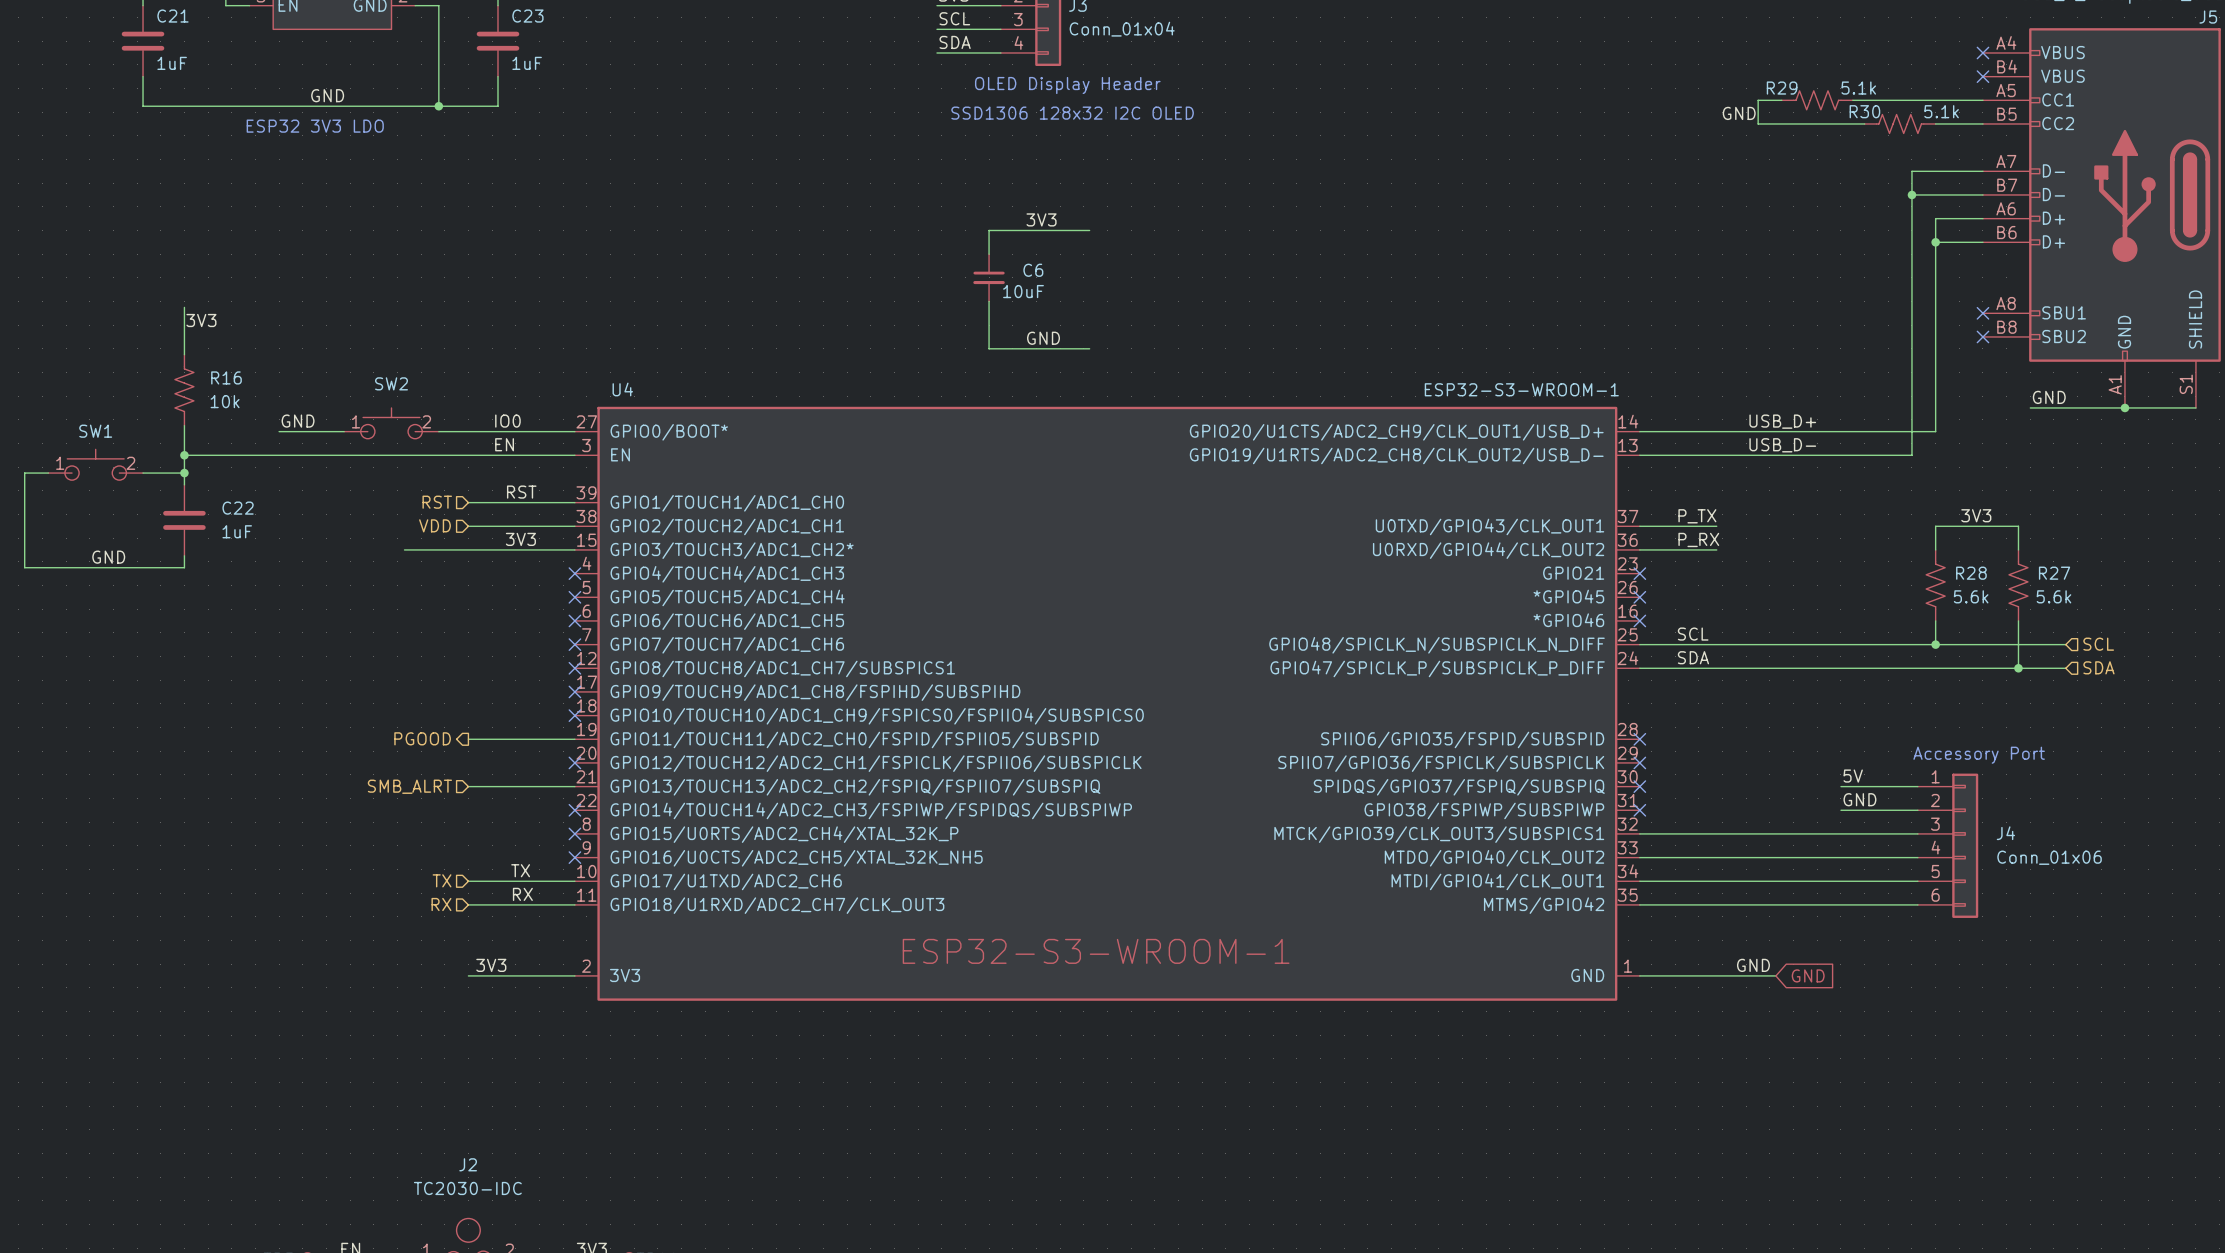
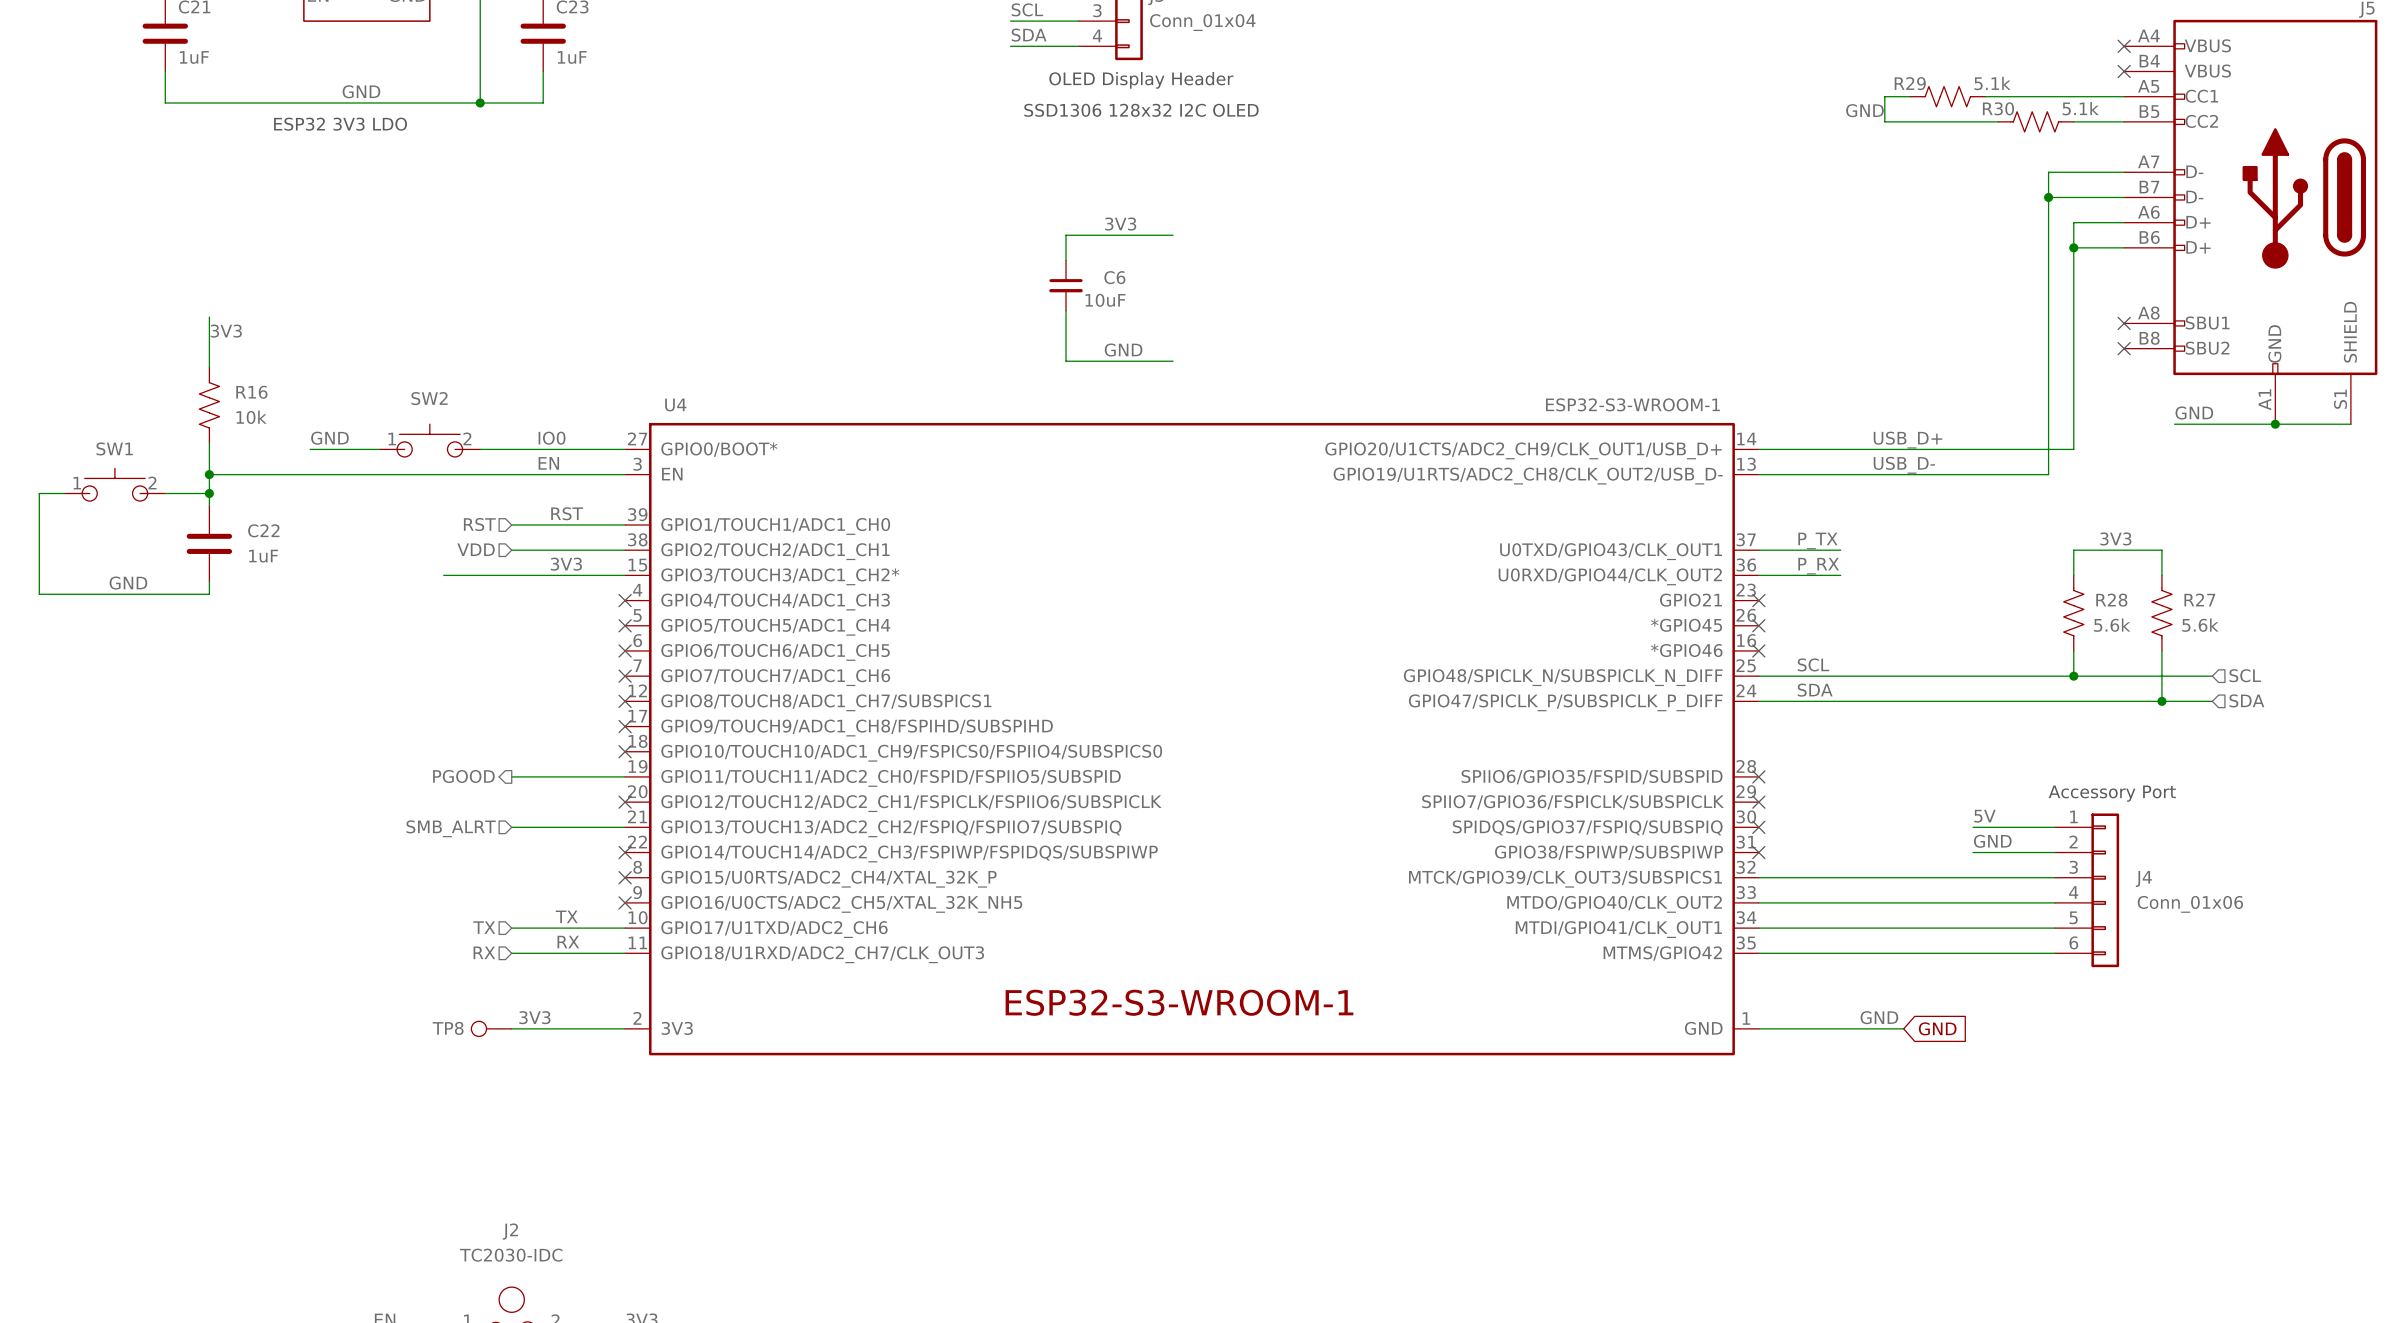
TP8: none -> (491, 1028)

